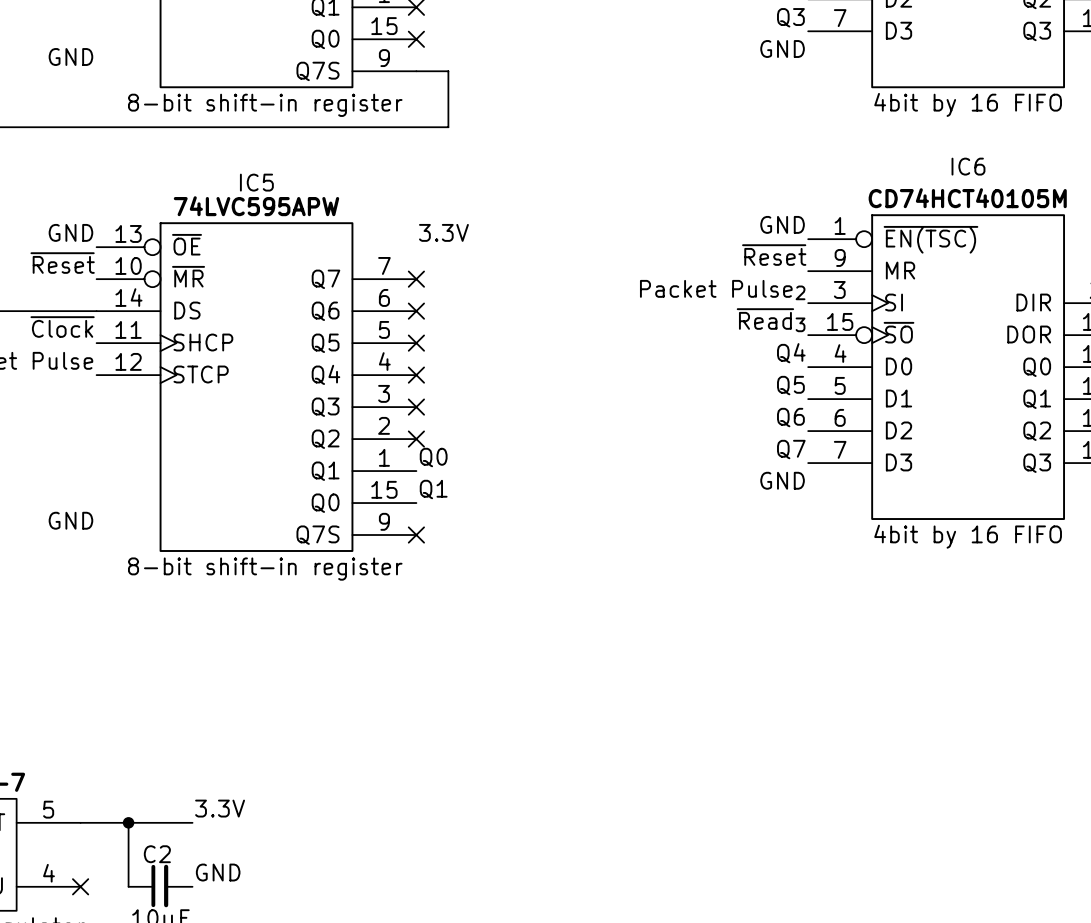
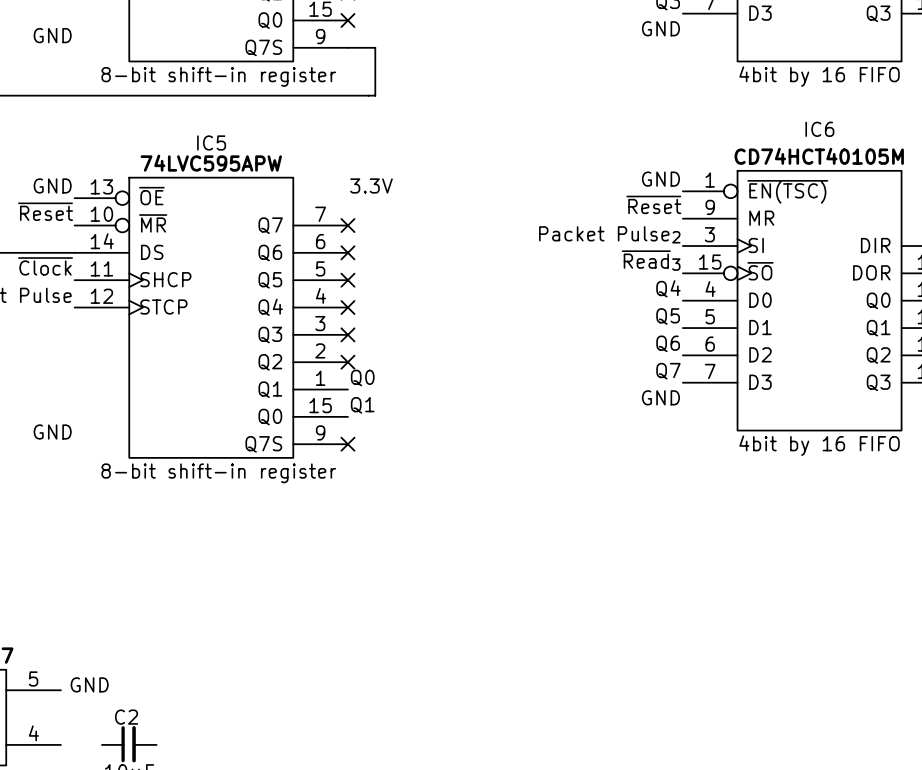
label: 3.3V (220, 808) -> none
label: none -> GND (89, 684)
wire: (80, 822) (192, 822) -> none
wire: (128, 822) (128, 886) -> none
junction: (128, 822) -> none
label: GND (218, 872) -> none
no-connect mark: (80, 886) -> none

